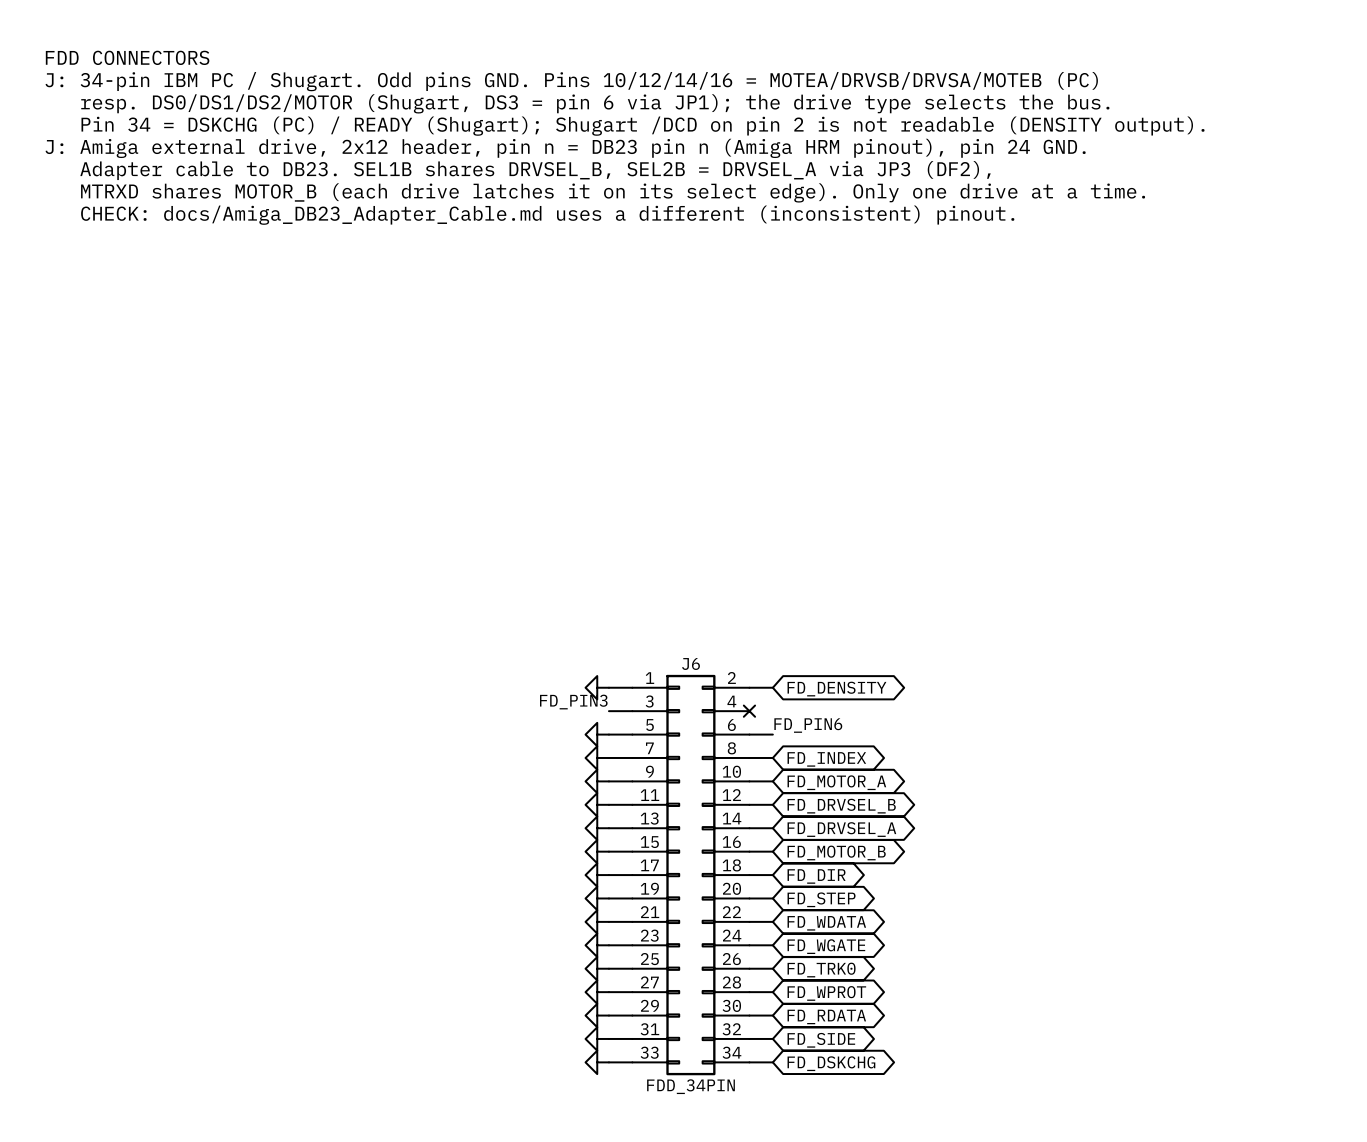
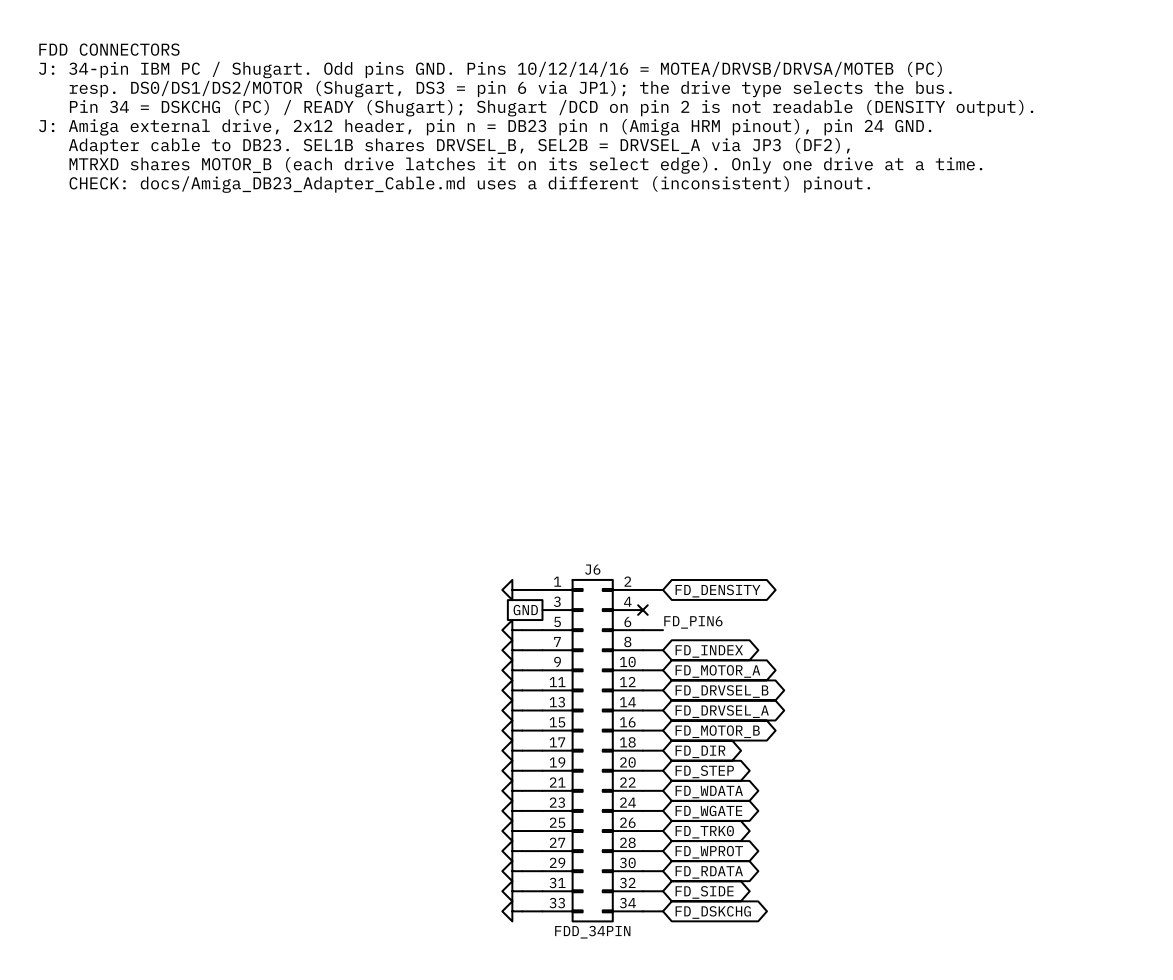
label: FD_PIN3 (573, 702) -> none
wire: (608, 711) (632, 711) -> none
global label: none -> GND (525, 610)

